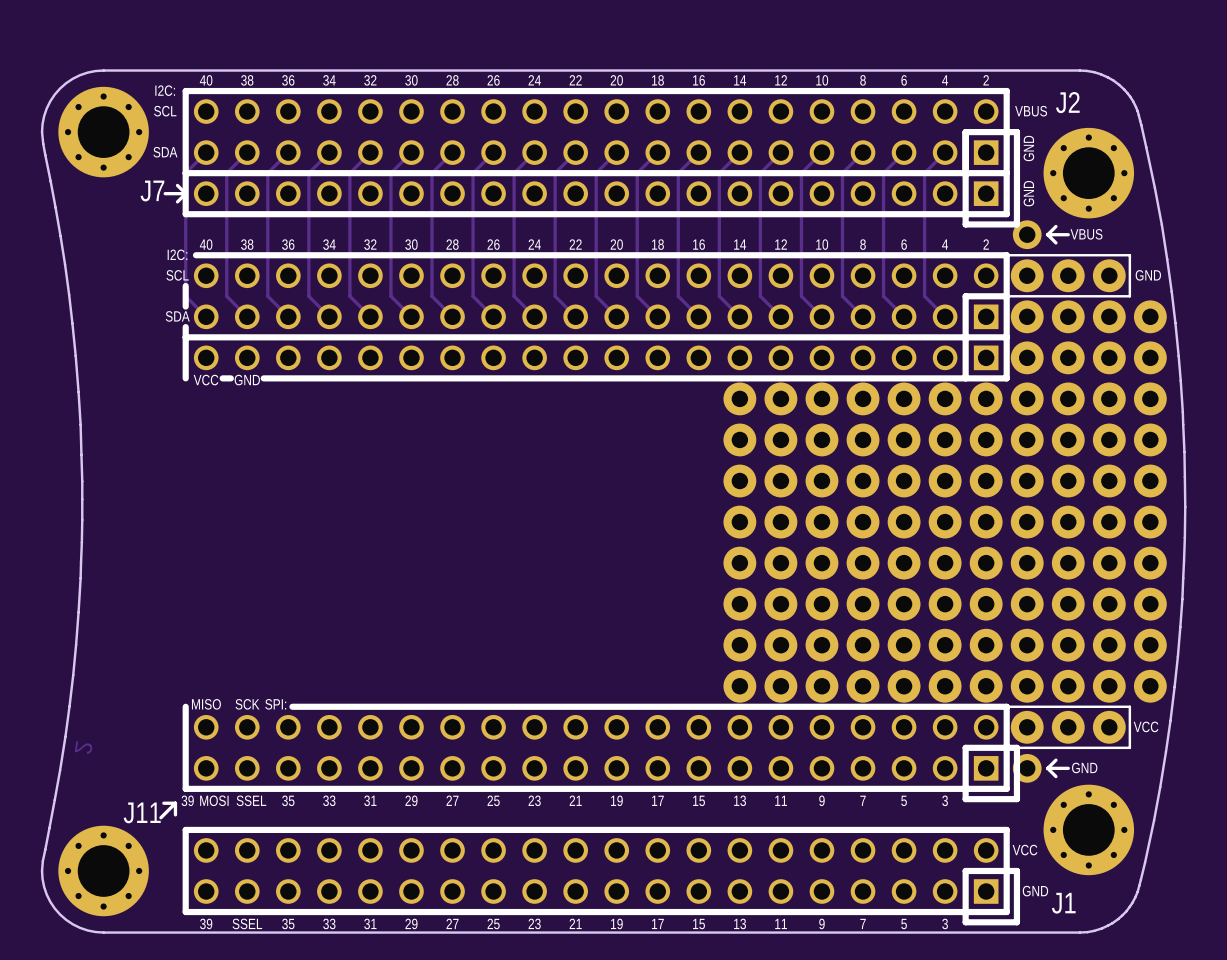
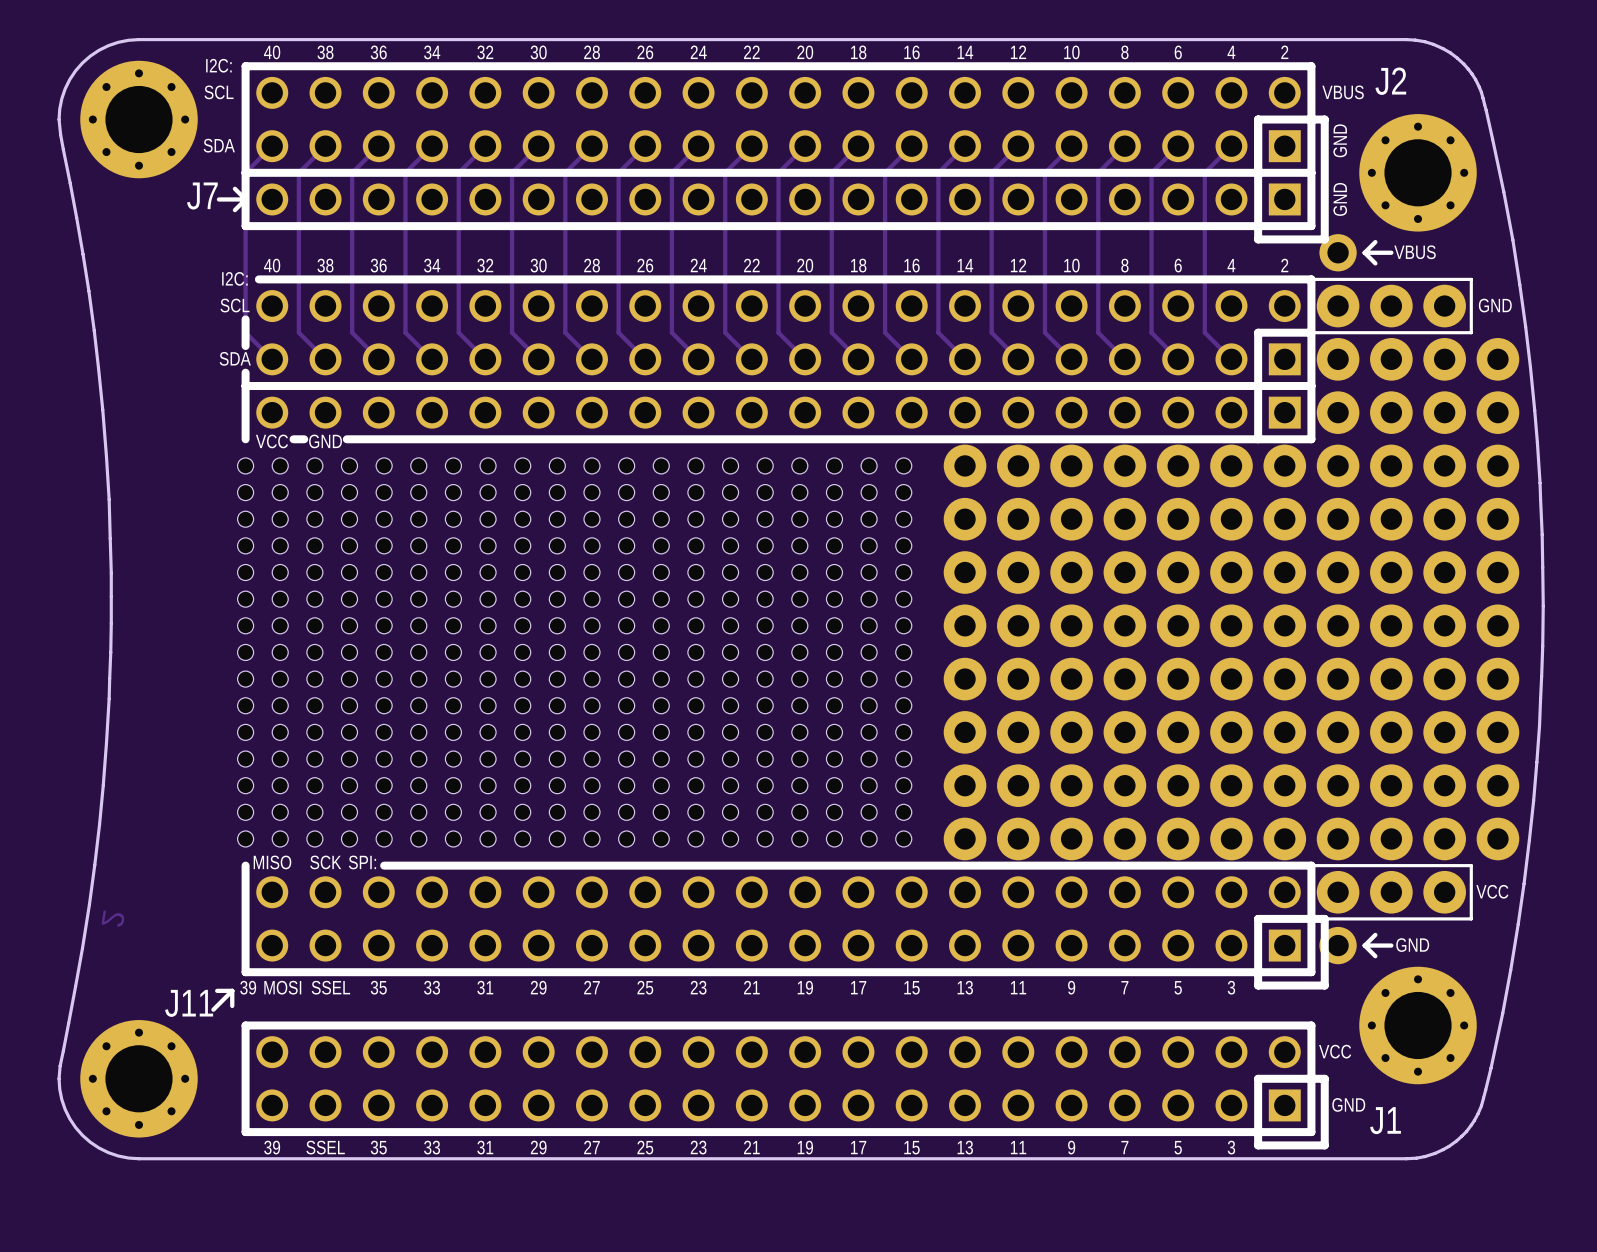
part: none -> (245, 465)
part: none -> (280, 465)
part: none -> (314, 465)
part: none -> (349, 465)
part: none -> (384, 465)
part: none -> (418, 465)
part: none -> (453, 465)
part: none -> (488, 465)
part: none -> (522, 465)
part: none -> (557, 465)
part: none -> (591, 465)
part: none -> (626, 465)
part: none -> (661, 465)
part: none -> (695, 465)
part: none -> (730, 465)
part: none -> (765, 465)
part: none -> (799, 465)
part: none -> (834, 465)
part: none -> (869, 465)
part: none -> (903, 465)
part: none -> (245, 492)
part: none -> (280, 492)
part: none -> (314, 492)
part: none -> (349, 492)
part: none -> (384, 492)
part: none -> (418, 492)
part: none -> (453, 492)
part: none -> (488, 492)
part: none -> (522, 492)
part: none -> (557, 492)
part: none -> (591, 492)
part: none -> (626, 492)
part: none -> (661, 492)
part: none -> (695, 492)
part: none -> (730, 492)
part: none -> (765, 492)
part: none -> (799, 492)
part: none -> (834, 492)
part: none -> (869, 492)
part: none -> (903, 492)
part: none -> (245, 519)
part: none -> (280, 519)
part: none -> (314, 519)
part: none -> (349, 519)
part: none -> (384, 519)
part: none -> (418, 519)
part: none -> (453, 519)
part: none -> (488, 519)
part: none -> (522, 519)
part: none -> (557, 519)
part: none -> (591, 519)
part: none -> (626, 519)
part: none -> (661, 519)
part: none -> (695, 519)
part: none -> (730, 519)
part: none -> (765, 519)
part: none -> (799, 519)
part: none -> (834, 519)
part: none -> (869, 519)
part: none -> (903, 519)
part: none -> (245, 545)
part: none -> (280, 545)
part: none -> (314, 545)
part: none -> (349, 545)
part: none -> (384, 545)
part: none -> (418, 545)
part: none -> (453, 545)
part: none -> (488, 545)
part: none -> (522, 545)
part: none -> (557, 545)
part: none -> (591, 545)
part: none -> (626, 545)
part: none -> (661, 545)
part: none -> (695, 545)
part: none -> (730, 545)
part: none -> (765, 545)
part: none -> (799, 545)
part: none -> (834, 545)
part: none -> (869, 545)
part: none -> (903, 545)
part: none -> (245, 572)
part: none -> (280, 572)
part: none -> (314, 572)
part: none -> (349, 572)
part: none -> (384, 572)
part: none -> (418, 572)
part: none -> (453, 572)
part: none -> (488, 572)
part: none -> (522, 572)
part: none -> (557, 572)
part: none -> (591, 572)
part: none -> (626, 572)
part: none -> (661, 572)
part: none -> (695, 572)
part: none -> (730, 572)
part: none -> (765, 572)
part: none -> (799, 572)
part: none -> (834, 572)
part: none -> (869, 572)
part: none -> (903, 572)
part: none -> (245, 599)
part: none -> (280, 599)
part: none -> (314, 599)
part: none -> (349, 599)
part: none -> (384, 599)
part: none -> (418, 599)
part: none -> (453, 599)
part: none -> (488, 599)
part: none -> (522, 599)
part: none -> (557, 599)
part: none -> (591, 599)
part: none -> (626, 599)
part: none -> (661, 599)
part: none -> (695, 599)
part: none -> (730, 599)
part: none -> (765, 599)
part: none -> (799, 599)
part: none -> (834, 599)
part: none -> (869, 599)
part: none -> (903, 599)
part: none -> (245, 625)
part: none -> (280, 625)
part: none -> (314, 625)
part: none -> (349, 625)
part: none -> (384, 625)
part: none -> (418, 625)
part: none -> (453, 625)
part: none -> (488, 625)
part: none -> (522, 625)
part: none -> (557, 625)
part: none -> (591, 625)
part: none -> (626, 625)
part: none -> (661, 625)
part: none -> (695, 625)
part: none -> (730, 625)
part: none -> (765, 625)
part: none -> (799, 625)
part: none -> (834, 625)
part: none -> (869, 625)
part: none -> (903, 625)
part: none -> (245, 652)
part: none -> (280, 652)
part: none -> (314, 652)
part: none -> (349, 652)
part: none -> (384, 652)
part: none -> (418, 652)
part: none -> (453, 652)
part: none -> (488, 652)
part: none -> (522, 652)
part: none -> (557, 652)
part: none -> (591, 652)
part: none -> (626, 652)
part: none -> (661, 652)
part: none -> (695, 652)
part: none -> (730, 652)
part: none -> (765, 652)
part: none -> (799, 652)
part: none -> (834, 652)
part: none -> (869, 652)
part: none -> (903, 652)
part: none -> (245, 679)
part: none -> (280, 679)
part: none -> (314, 679)
part: none -> (349, 679)
part: none -> (384, 679)
part: none -> (418, 679)
part: none -> (453, 679)
part: none -> (488, 679)
part: none -> (522, 679)
part: none -> (557, 679)
part: none -> (591, 679)
part: none -> (626, 679)
part: none -> (661, 679)
part: none -> (695, 679)
part: none -> (730, 679)
part: none -> (765, 679)
part: none -> (799, 679)
part: none -> (834, 679)
part: none -> (869, 679)
part: none -> (903, 679)
part: none -> (245, 705)
part: none -> (280, 705)
part: none -> (314, 705)
part: none -> (349, 705)
part: none -> (384, 705)
part: none -> (418, 705)
part: none -> (453, 705)
part: none -> (488, 705)
part: none -> (522, 705)
part: none -> (557, 705)
part: none -> (591, 705)
part: none -> (626, 705)
part: none -> (661, 705)
part: none -> (695, 705)
part: none -> (730, 705)
part: none -> (765, 705)
part: none -> (799, 705)
part: none -> (834, 705)
part: none -> (869, 705)
part: none -> (903, 705)
part: none -> (245, 732)
part: none -> (280, 732)
part: none -> (314, 732)
part: none -> (349, 732)
part: none -> (384, 732)
part: none -> (418, 732)
part: none -> (453, 732)
part: none -> (488, 732)
part: none -> (522, 732)
part: none -> (557, 732)
part: none -> (591, 732)
part: none -> (626, 732)
part: none -> (661, 732)
part: none -> (695, 732)
part: none -> (730, 732)
part: none -> (765, 732)
part: none -> (799, 732)
part: none -> (834, 732)
part: none -> (869, 732)
part: none -> (903, 732)
part: none -> (245, 759)
part: none -> (280, 759)
part: none -> (314, 759)
part: none -> (349, 759)
part: none -> (384, 759)
part: none -> (418, 759)
part: none -> (453, 759)
part: none -> (488, 759)
part: none -> (522, 759)
part: none -> (557, 759)
part: none -> (591, 759)
part: none -> (626, 759)
part: none -> (661, 759)
part: none -> (695, 759)
part: none -> (730, 759)
part: none -> (765, 759)
part: none -> (799, 759)
part: none -> (834, 759)
part: none -> (869, 759)
part: none -> (903, 759)
part: none -> (245, 785)
part: none -> (280, 785)
part: none -> (314, 785)
part: none -> (349, 785)
part: none -> (384, 785)
part: none -> (418, 785)
part: none -> (453, 785)
part: none -> (488, 785)
part: none -> (522, 785)
part: none -> (557, 785)
part: none -> (591, 785)
part: none -> (626, 785)
part: none -> (661, 785)
part: none -> (695, 785)
part: none -> (730, 785)
part: none -> (765, 785)
part: none -> (799, 785)
part: none -> (834, 785)
part: none -> (869, 785)
part: none -> (903, 785)
part: none -> (245, 812)
part: none -> (280, 812)
part: none -> (314, 812)
part: none -> (349, 812)
part: none -> (384, 812)
part: none -> (418, 812)
part: none -> (453, 812)
part: none -> (488, 812)
part: none -> (522, 812)
part: none -> (557, 812)
part: none -> (591, 812)
part: none -> (626, 812)
part: none -> (661, 812)
part: none -> (695, 812)
part: none -> (730, 812)
part: none -> (765, 812)
part: none -> (799, 812)
part: none -> (834, 812)
part: none -> (869, 812)
part: none -> (903, 812)
part: none -> (245, 838)
part: none -> (280, 838)
part: none -> (314, 838)
part: none -> (349, 838)
part: none -> (384, 838)
part: none -> (418, 838)
part: none -> (453, 838)
part: none -> (488, 838)
part: none -> (522, 838)
part: none -> (557, 838)
part: none -> (591, 838)
part: none -> (626, 838)
part: none -> (661, 838)
part: none -> (695, 838)
part: none -> (730, 838)
part: none -> (765, 838)
part: none -> (799, 838)
part: none -> (834, 838)
part: none -> (869, 838)
part: none -> (903, 838)

